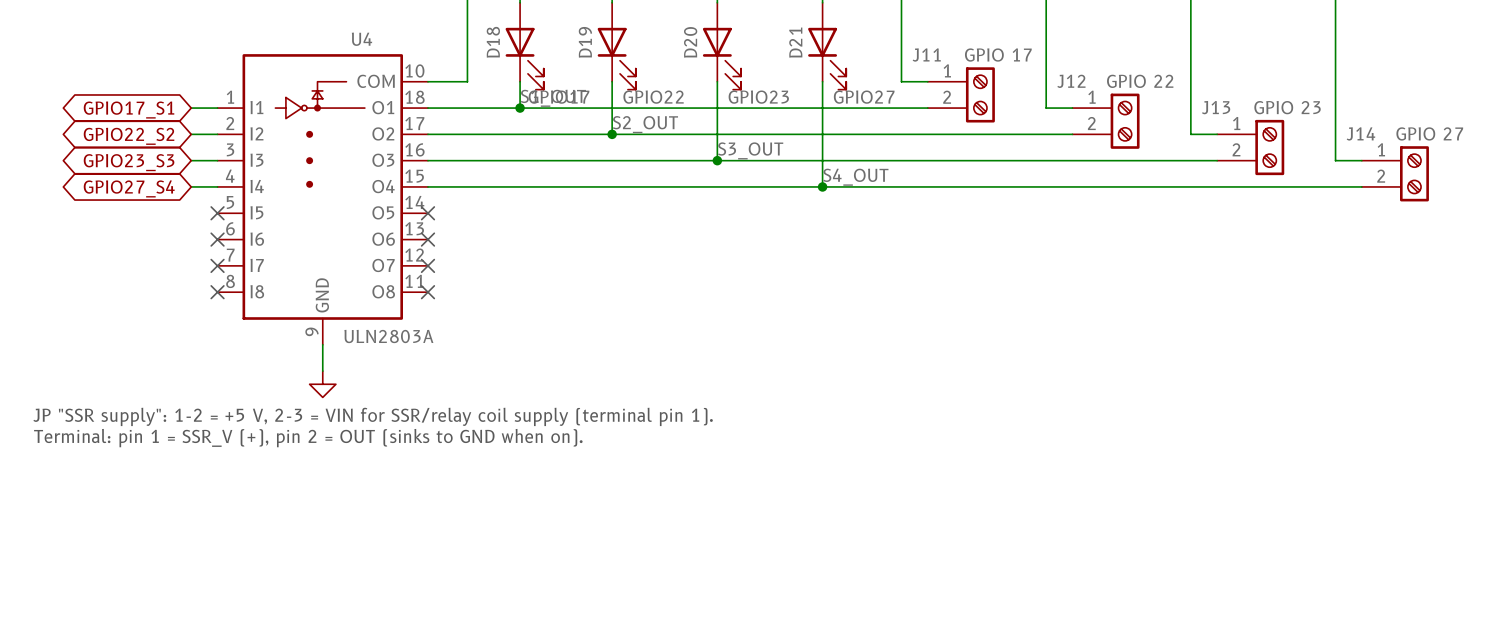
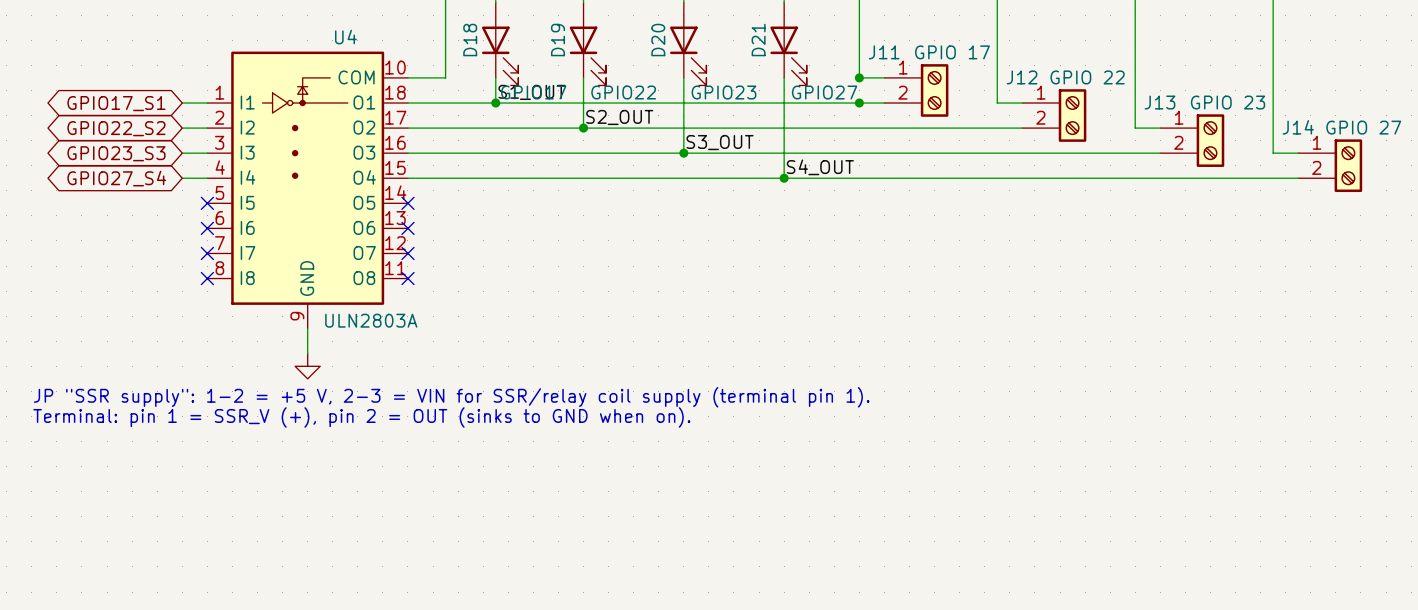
junction: none -> (859, 77)
junction: none -> (859, 103)

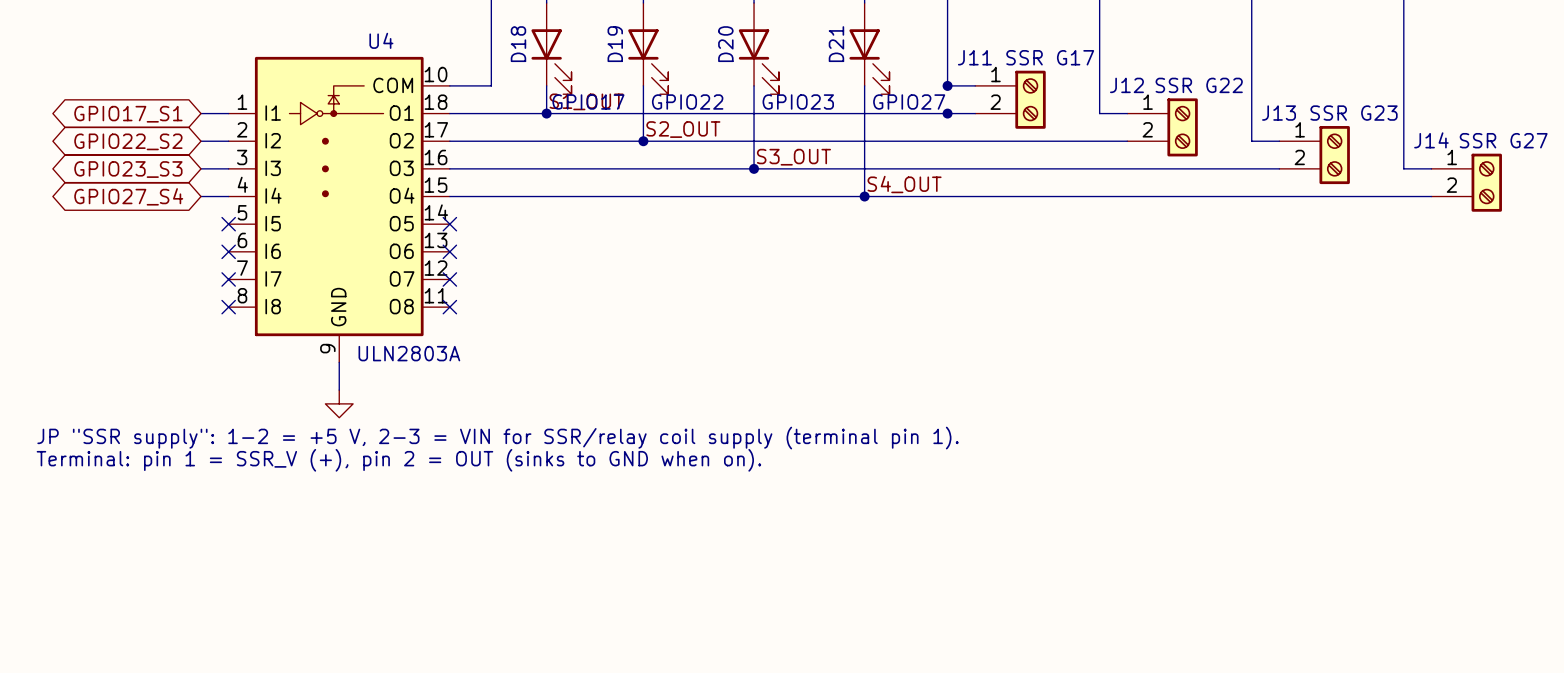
J11 value: GPIO 17 (952, 52) -> SSR G17 (1050, 57)
J12 value: GPIO 22 (1087, 77) -> SSR G22 (1199, 85)
J13 value: GPIO 23 (1228, 102) -> SSR G23 (1354, 113)
J14 value: GPIO 27 (1363, 127) -> SSR G27 (1503, 140)

